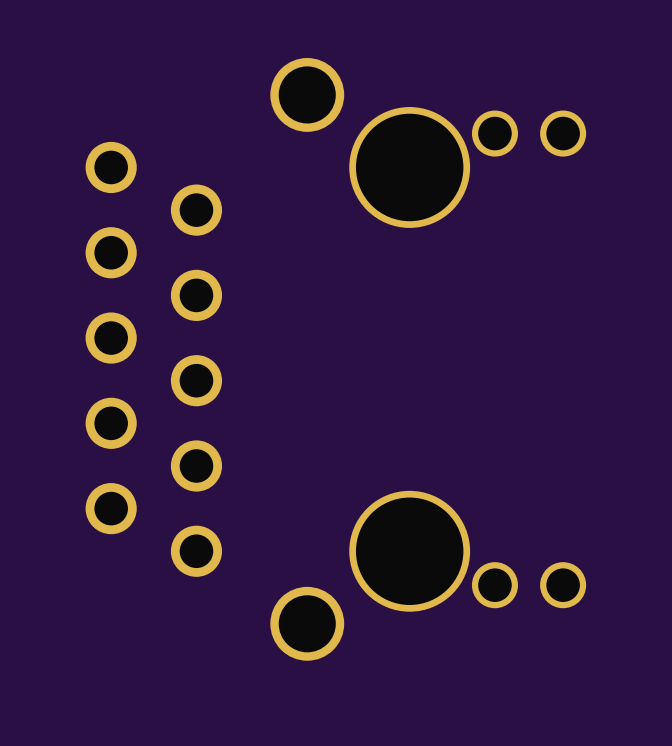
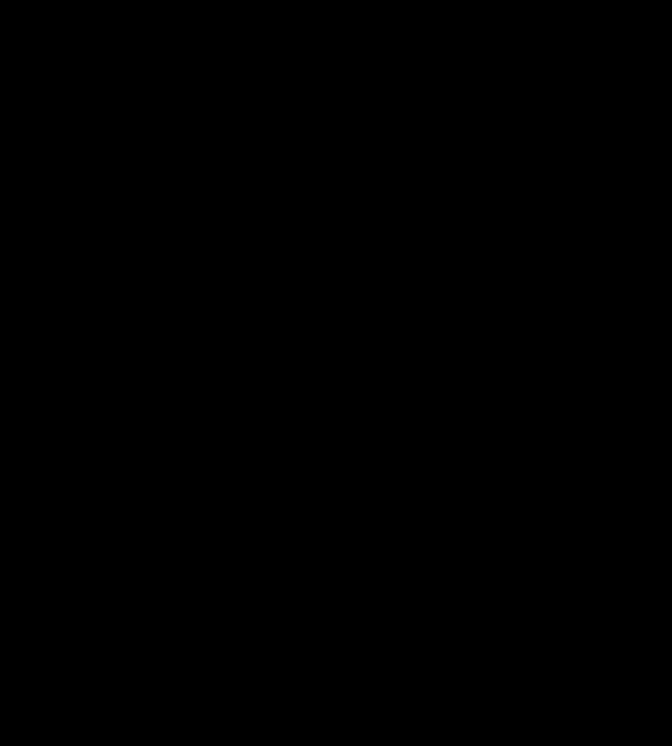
part: (335, 359) -> none

